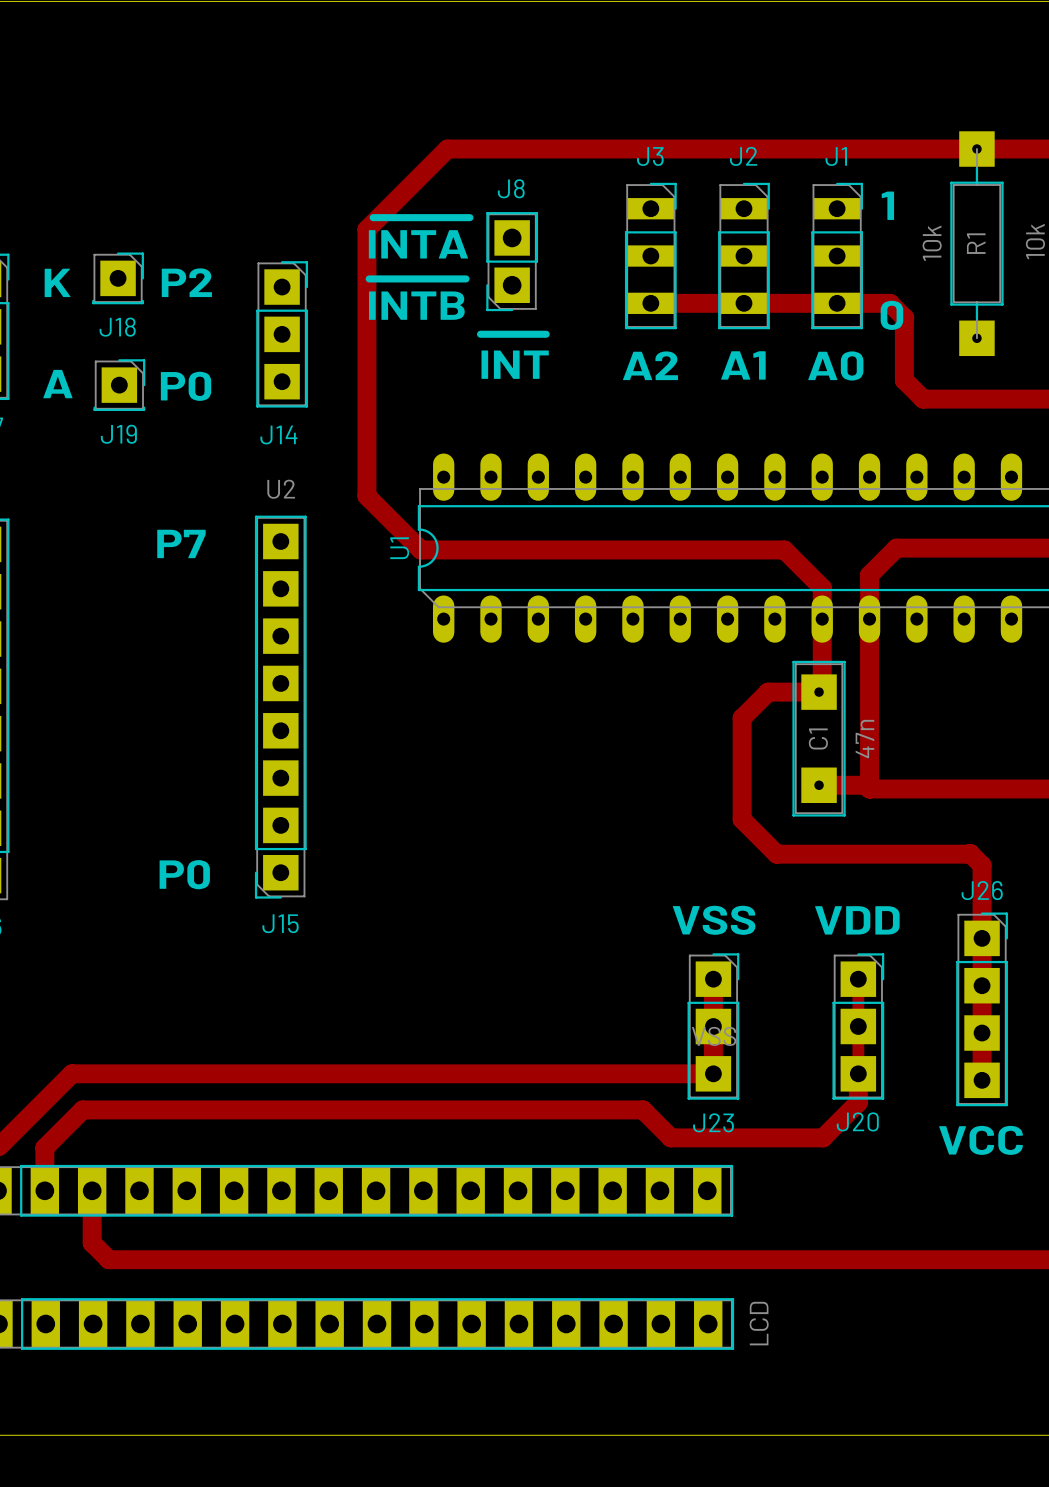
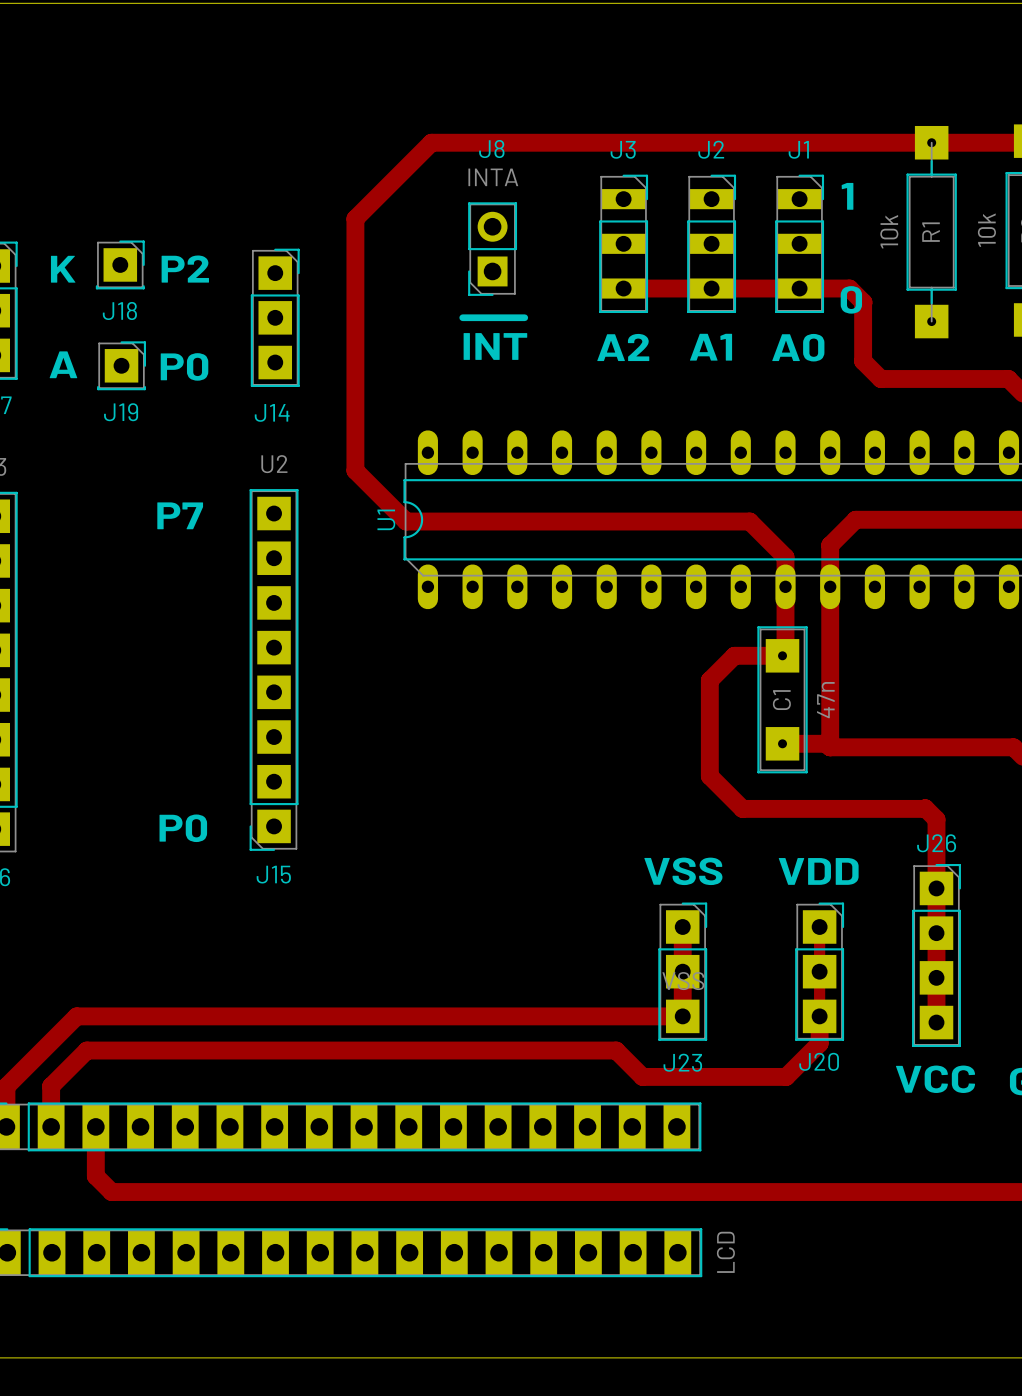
J8 value: none -> INTA (493, 177)
J8 name position: J8 (511, 188) -> J8 (491, 149)
J8 footprint: [486, 212, 539, 312] -> [468, 202, 518, 296]
line: (373, 217) (469, 217) -> none
text: INTA (418, 244) -> none
line: (369, 278) (466, 278) -> none
text: INTB (416, 305) -> none

